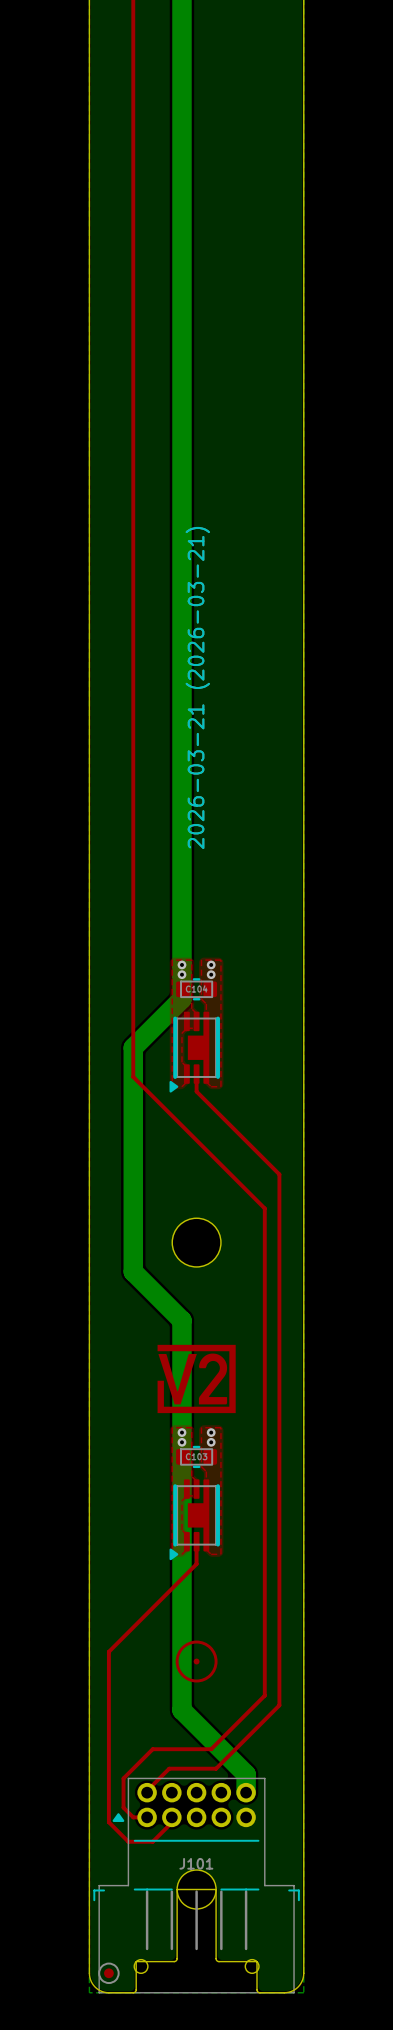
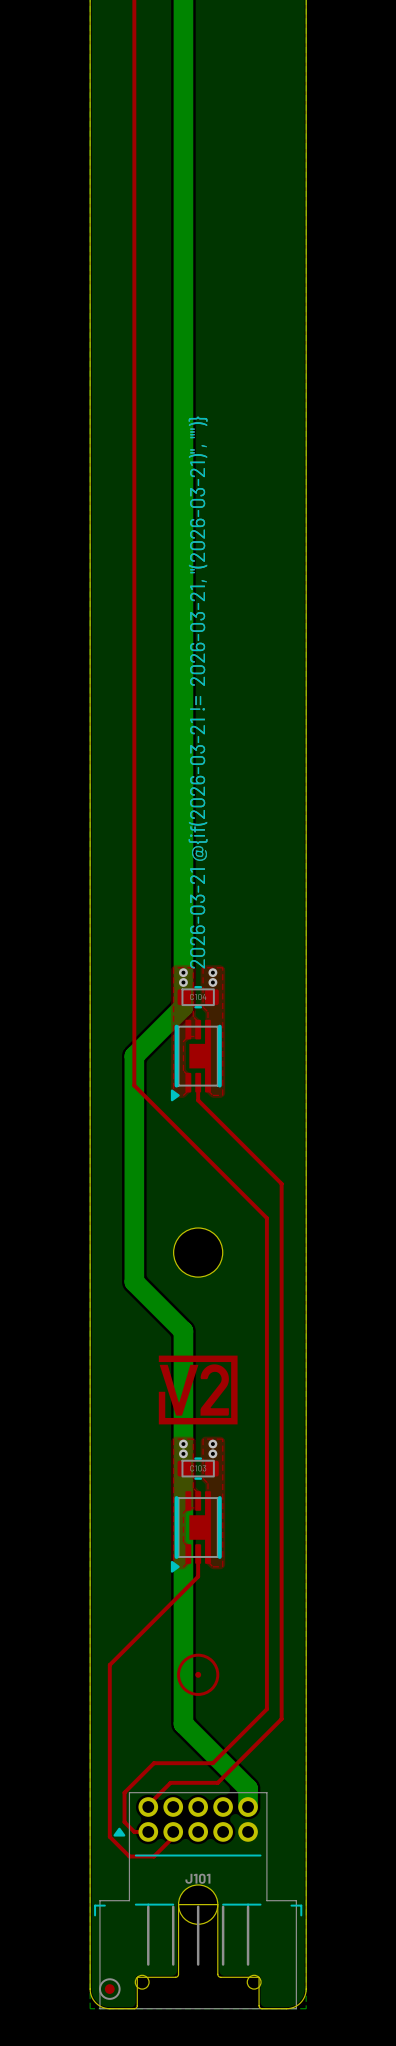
drawing shape: [185, 526, 210, 850] -> [188, 416, 208, 969]

